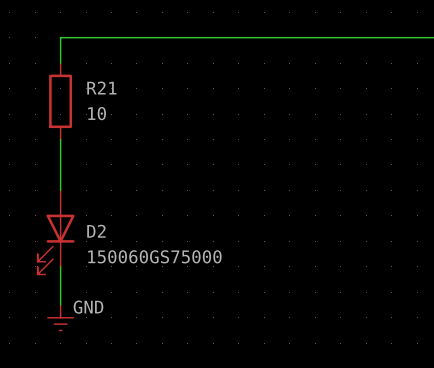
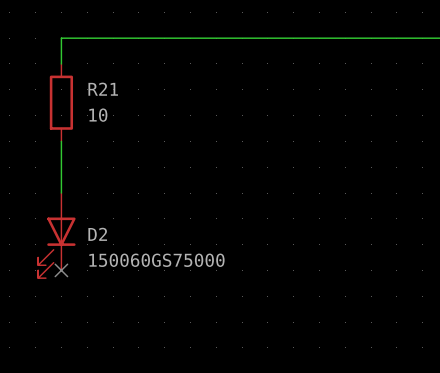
wire: (60, 266) (60, 305) -> none
no-connect mark: none -> (61, 270)
power symbol: GND (60, 317) -> none

